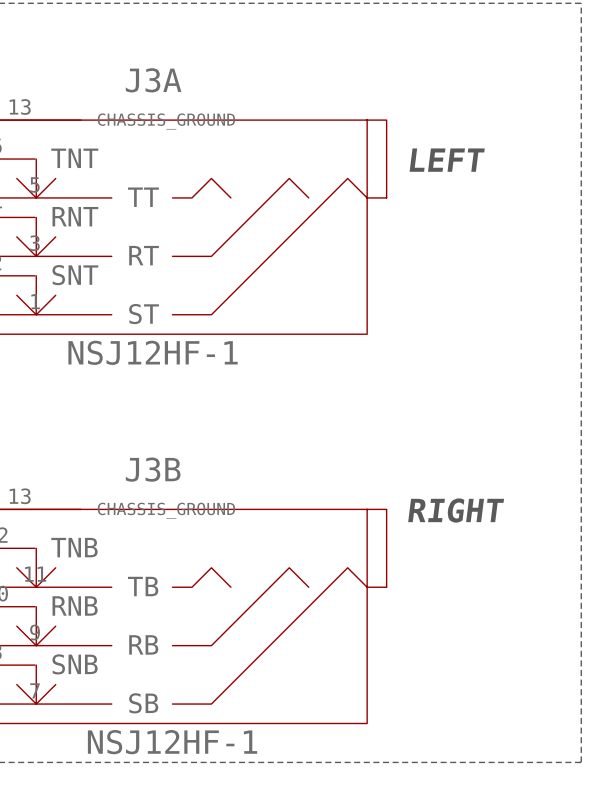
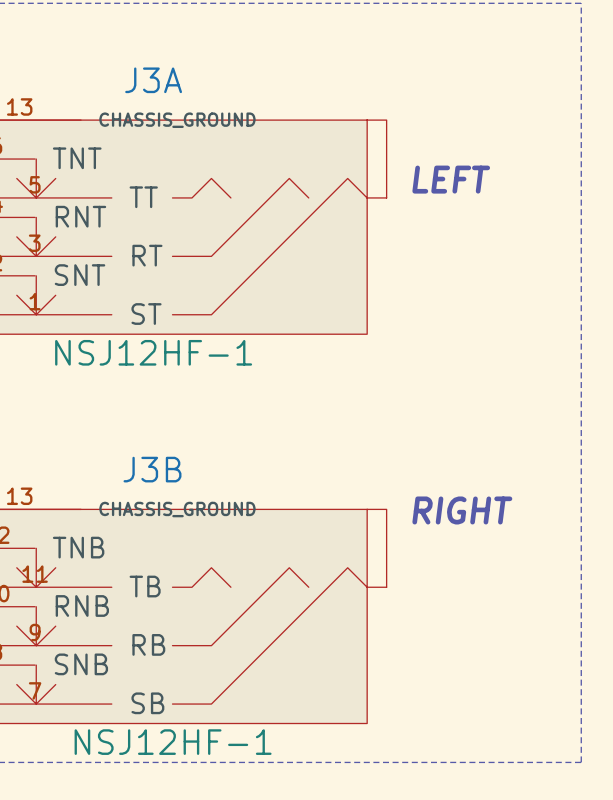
text position: LEFT (447, 160) -> LEFT (451, 179)

